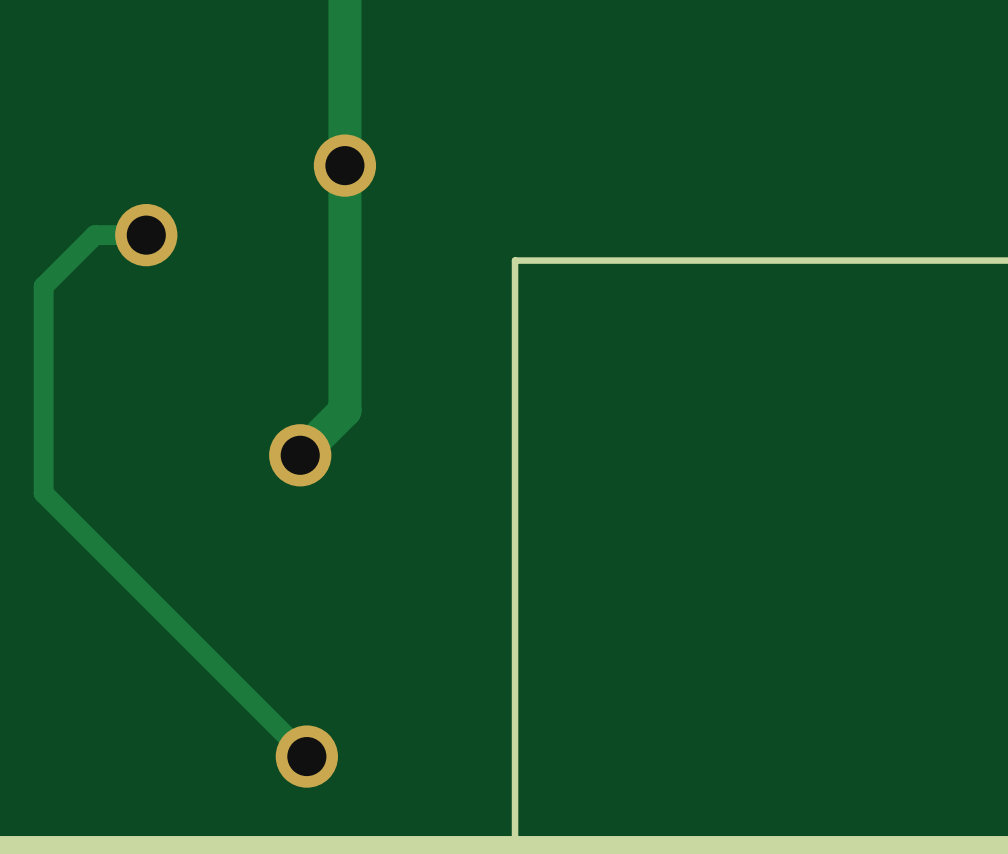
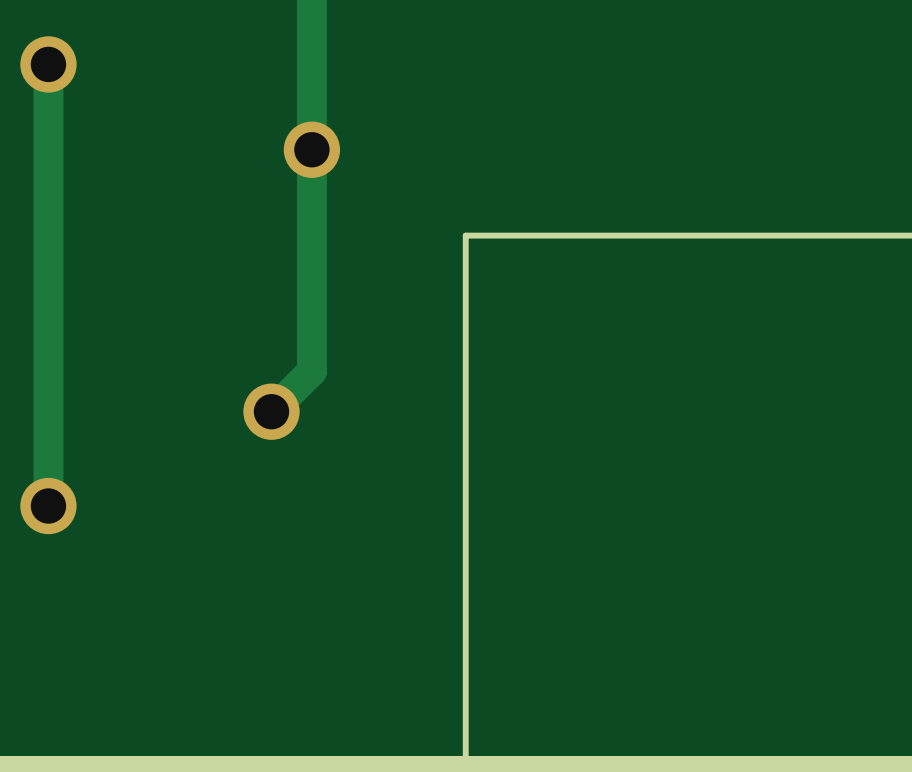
track: none -> (48, 64) (48, 506)
via: none -> (48, 64)
track: (146, 235) (94, 235) (43, 286) (43, 493) (306, 756) -> none
via: (146, 235) -> none
via: none -> (48, 506)
via: (306, 756) -> none

